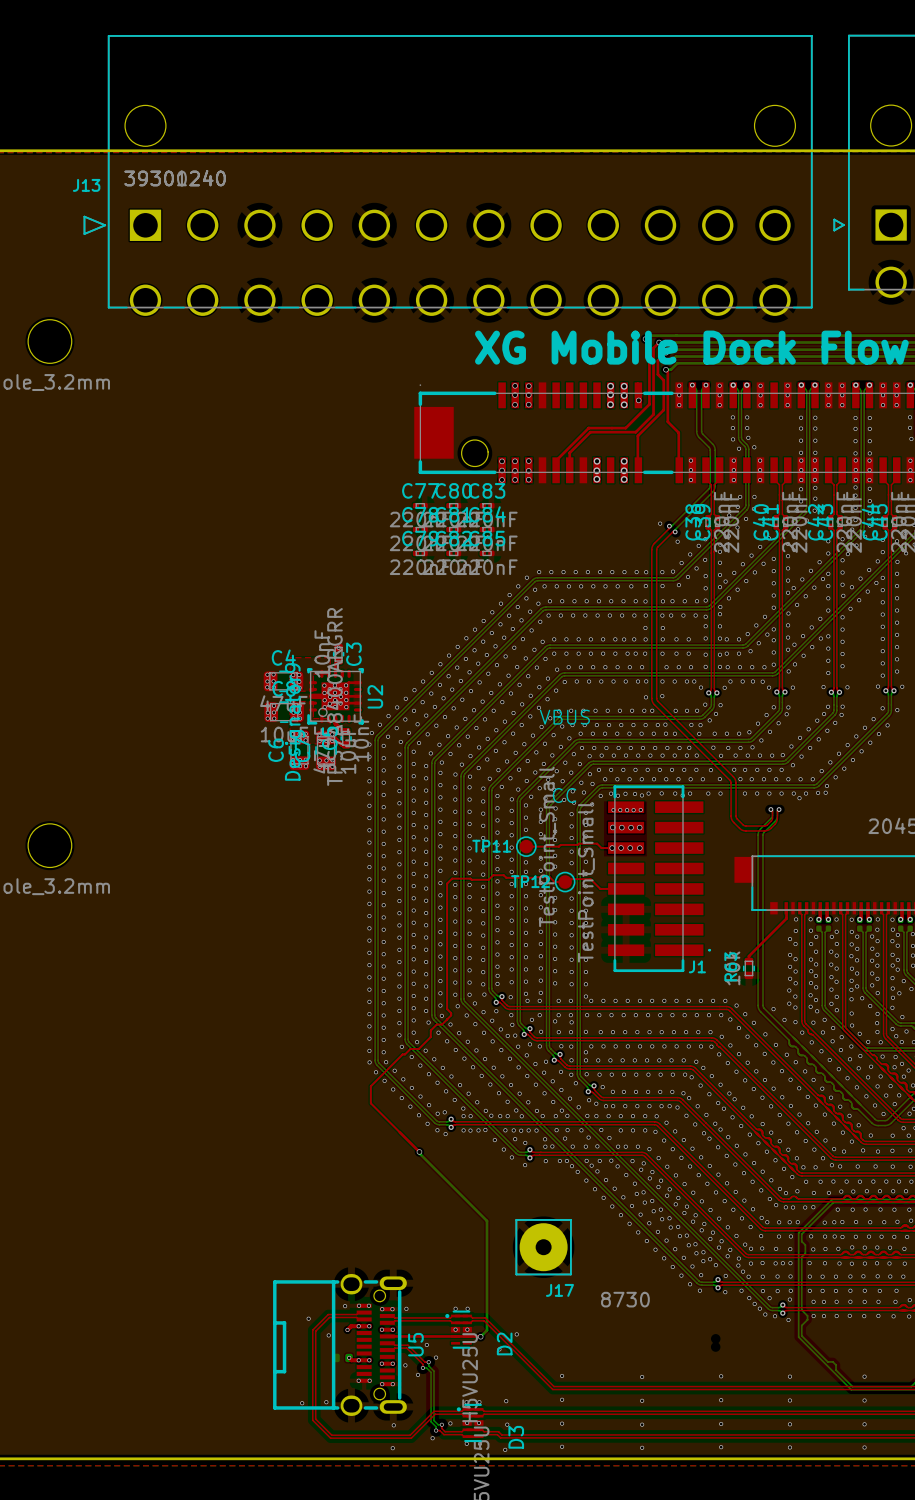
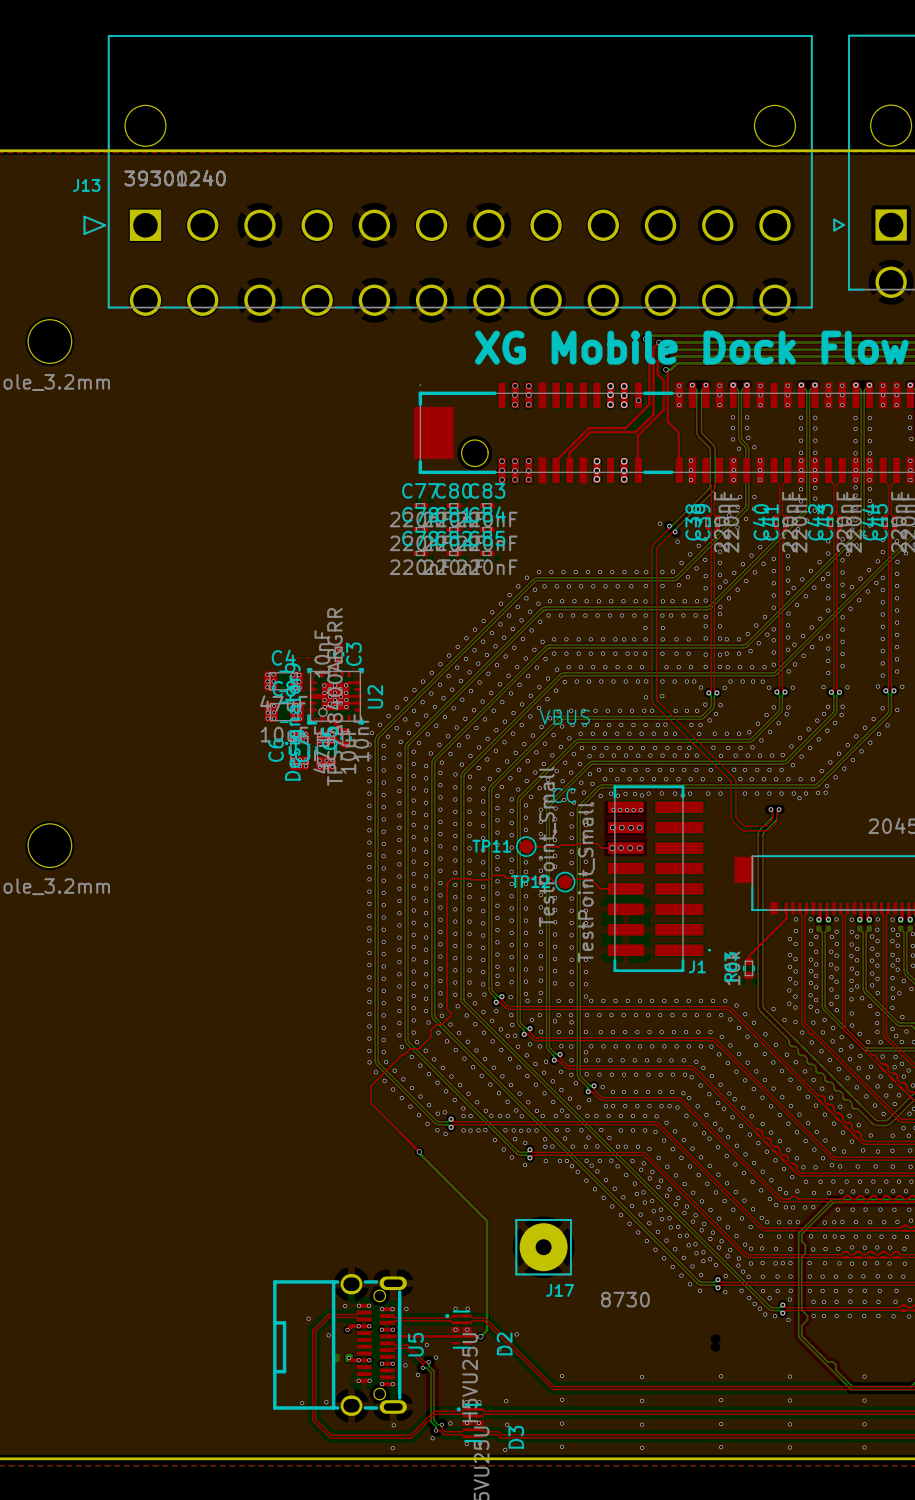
via: (596, 1103) -> none

